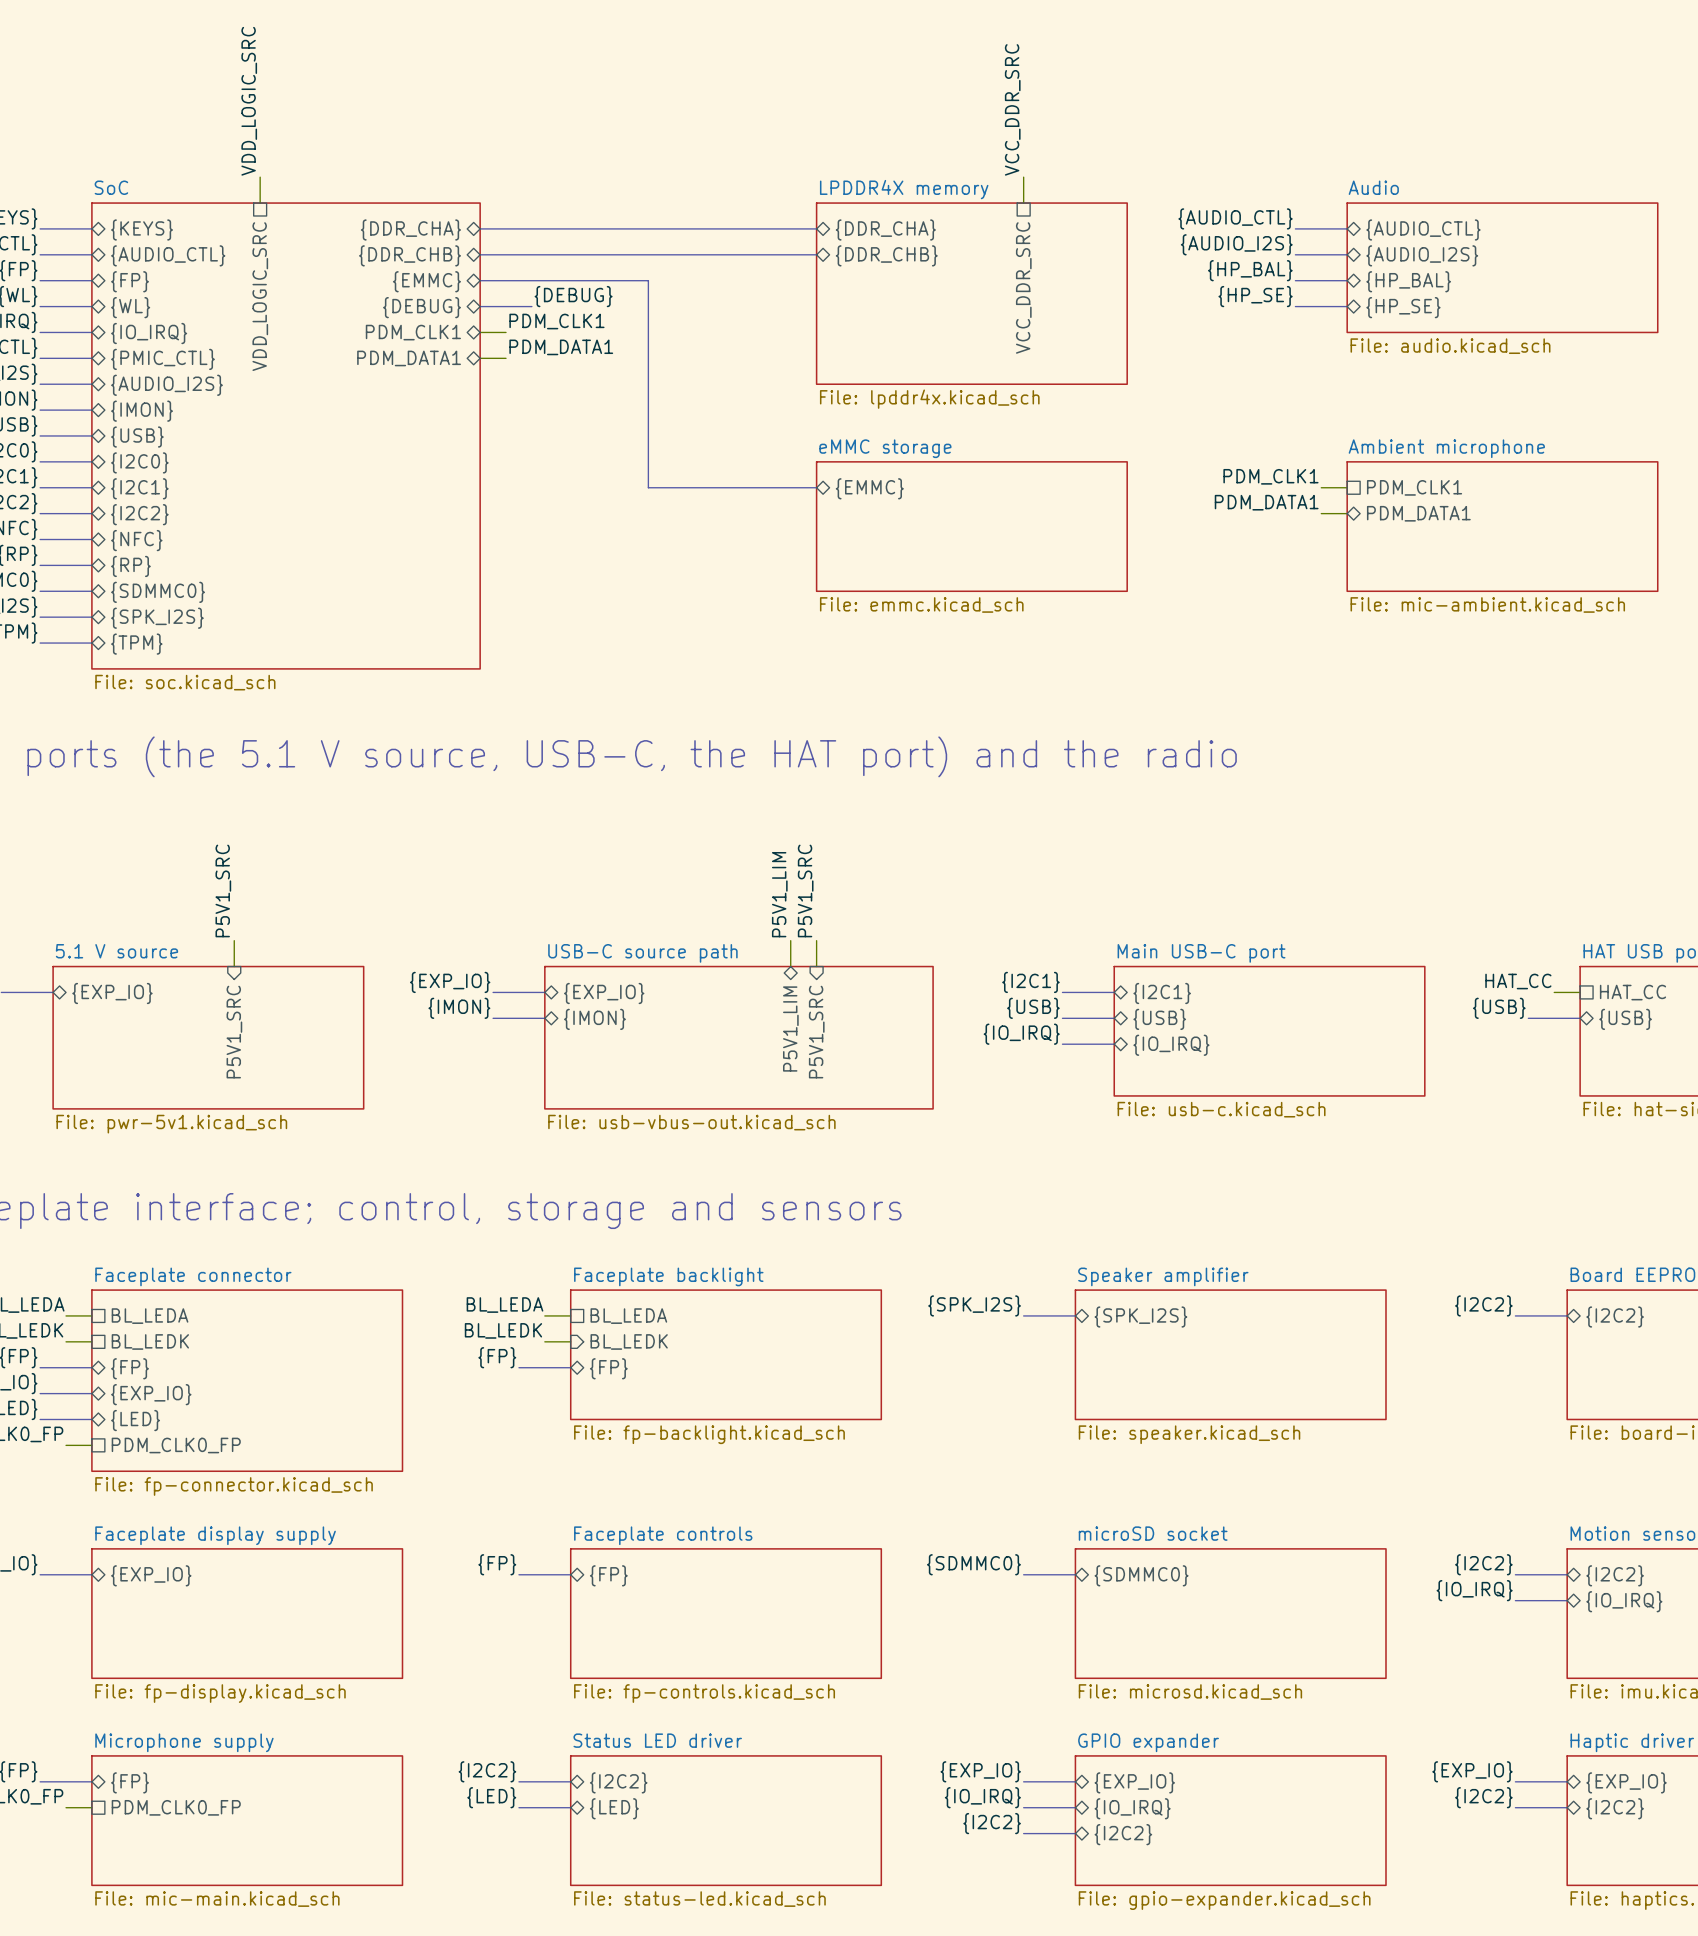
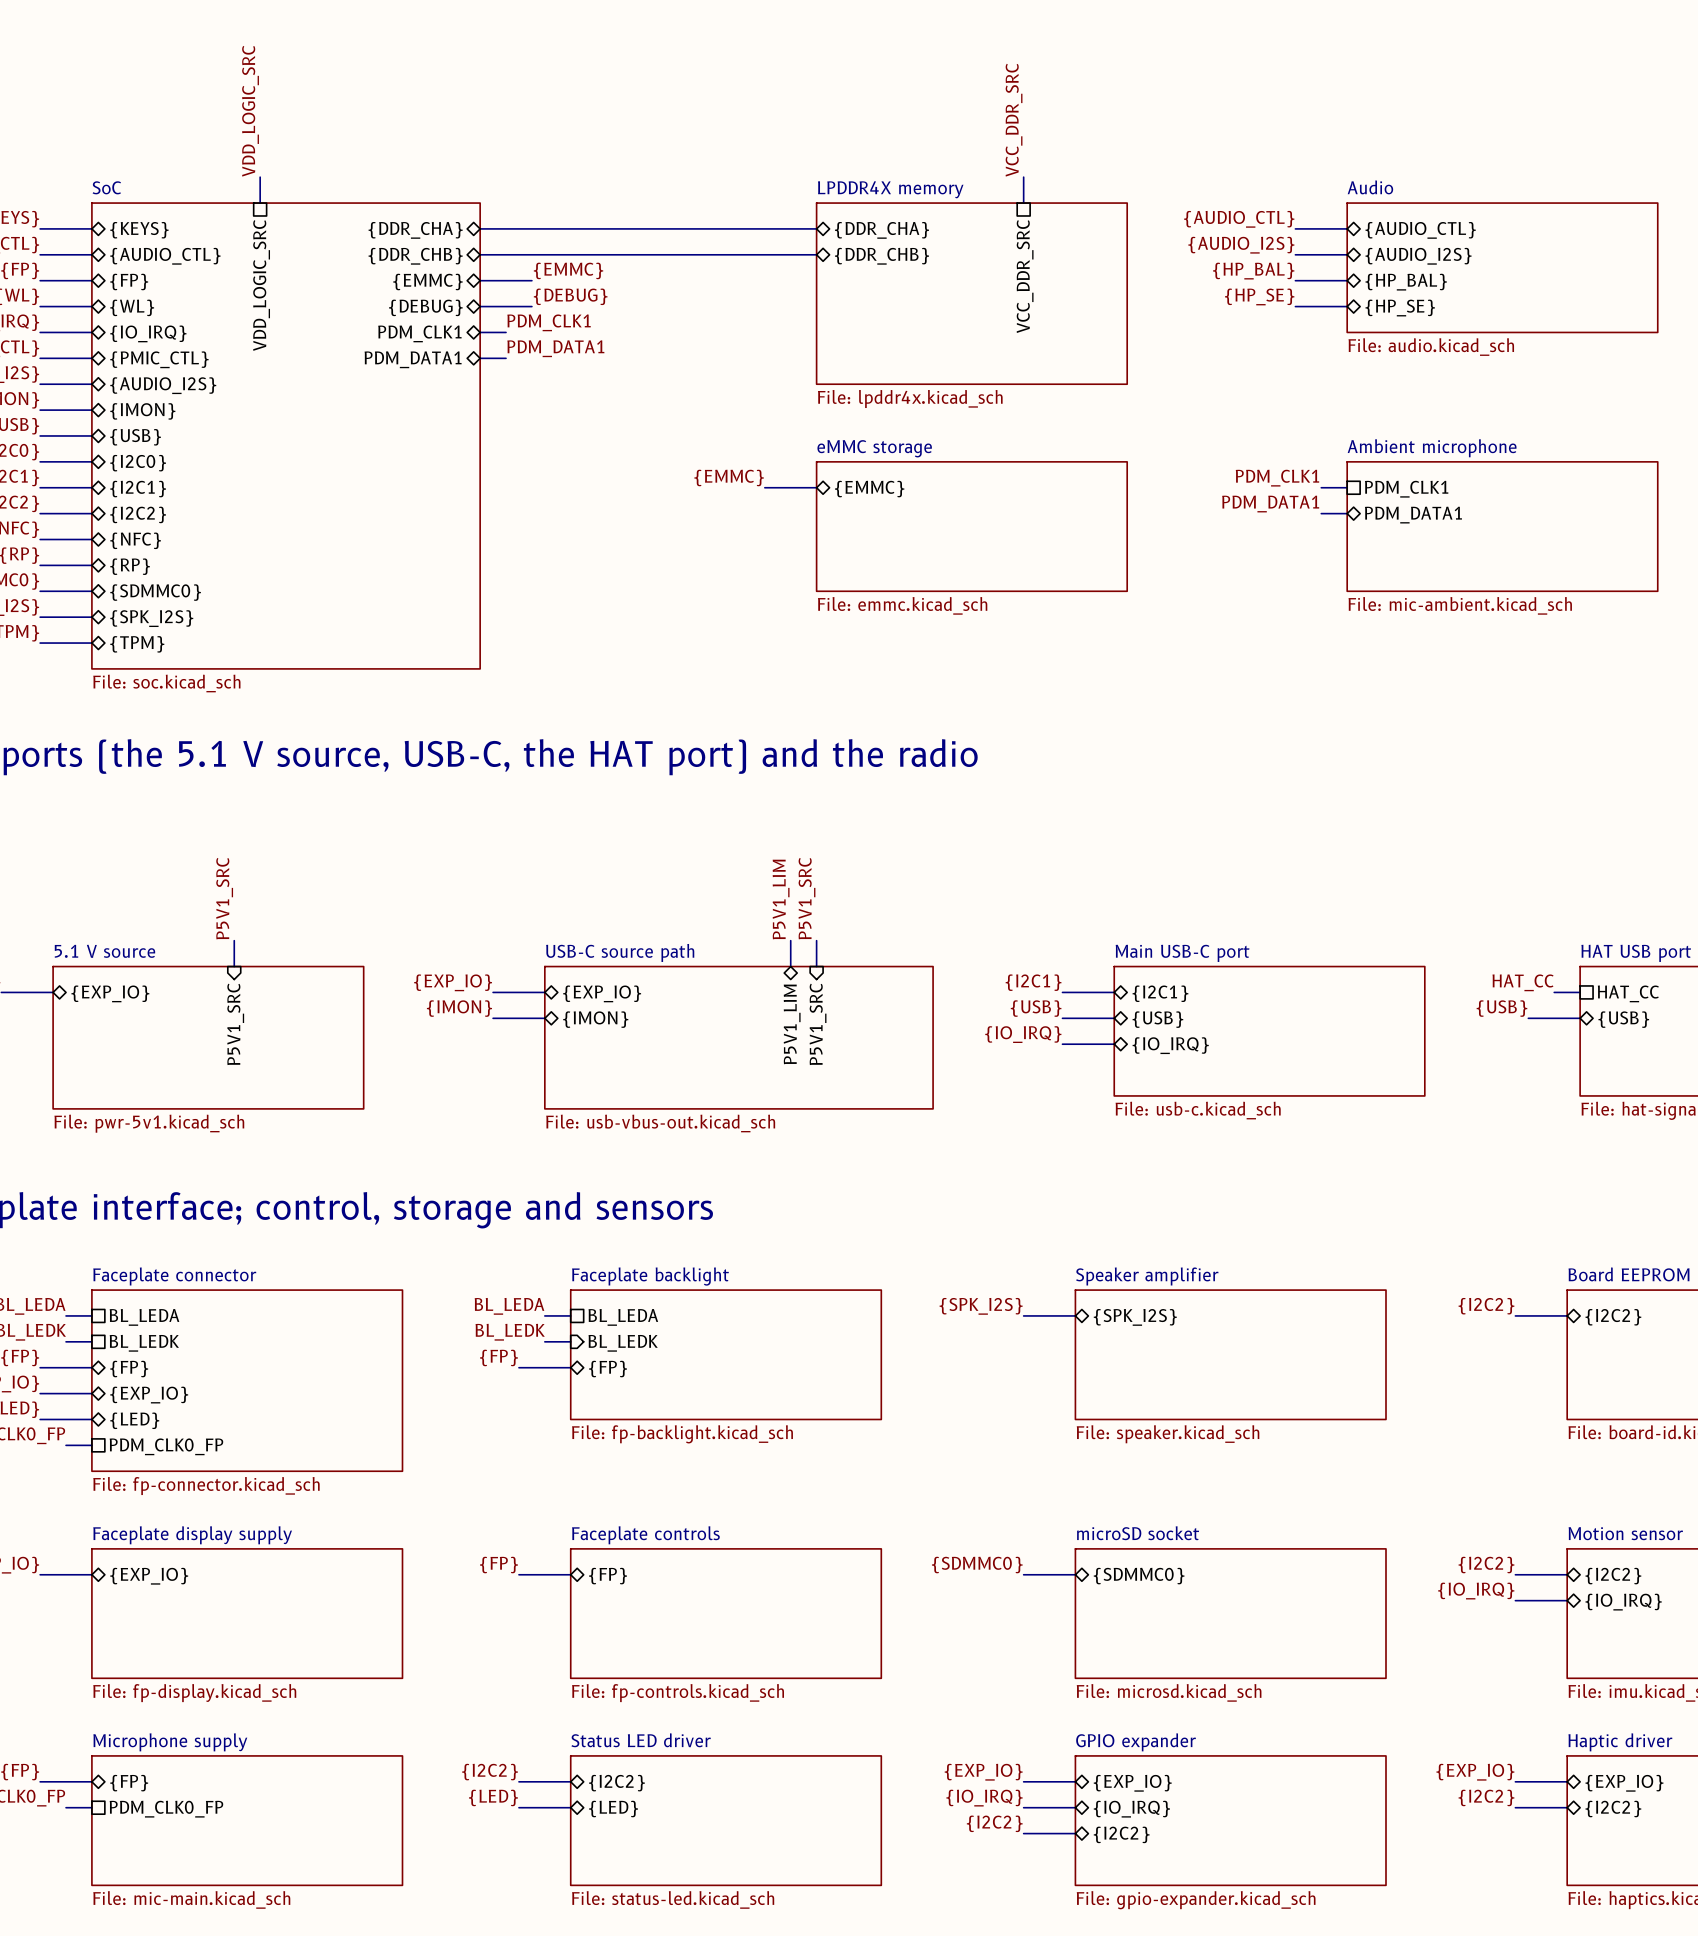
label: none -> {EMMC} (568, 270)
bus: (531, 280) (648, 280) (648, 487) (764, 487) -> none
label: none -> {EMMC} (729, 477)

